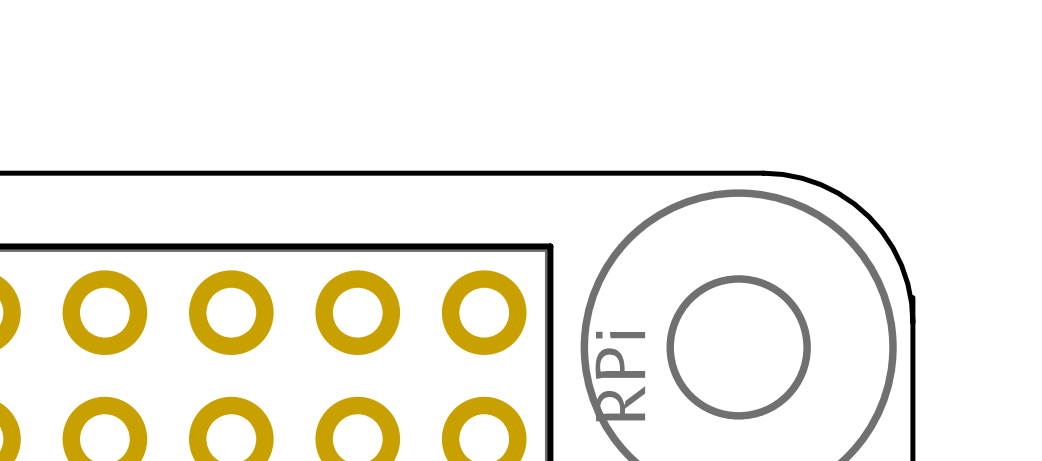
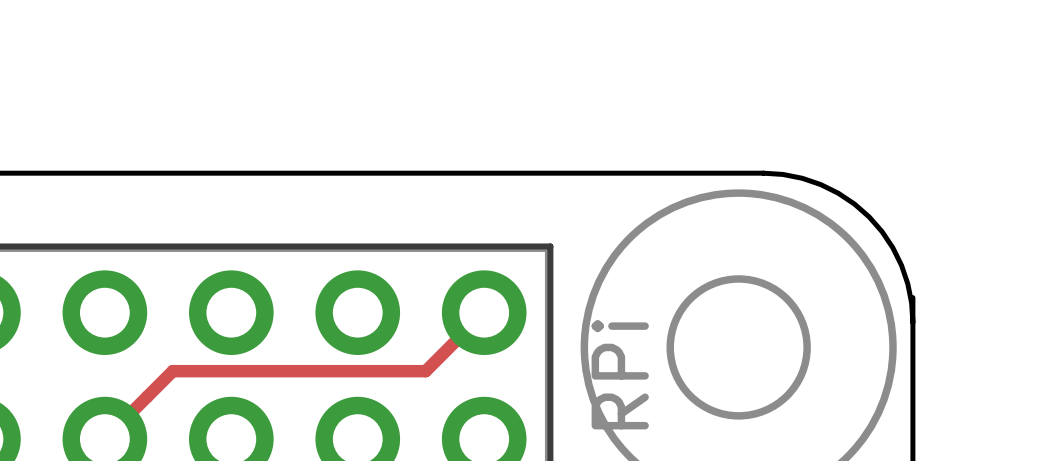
track: none -> (484, 312) (425, 371) (172, 371) (104, 439)

